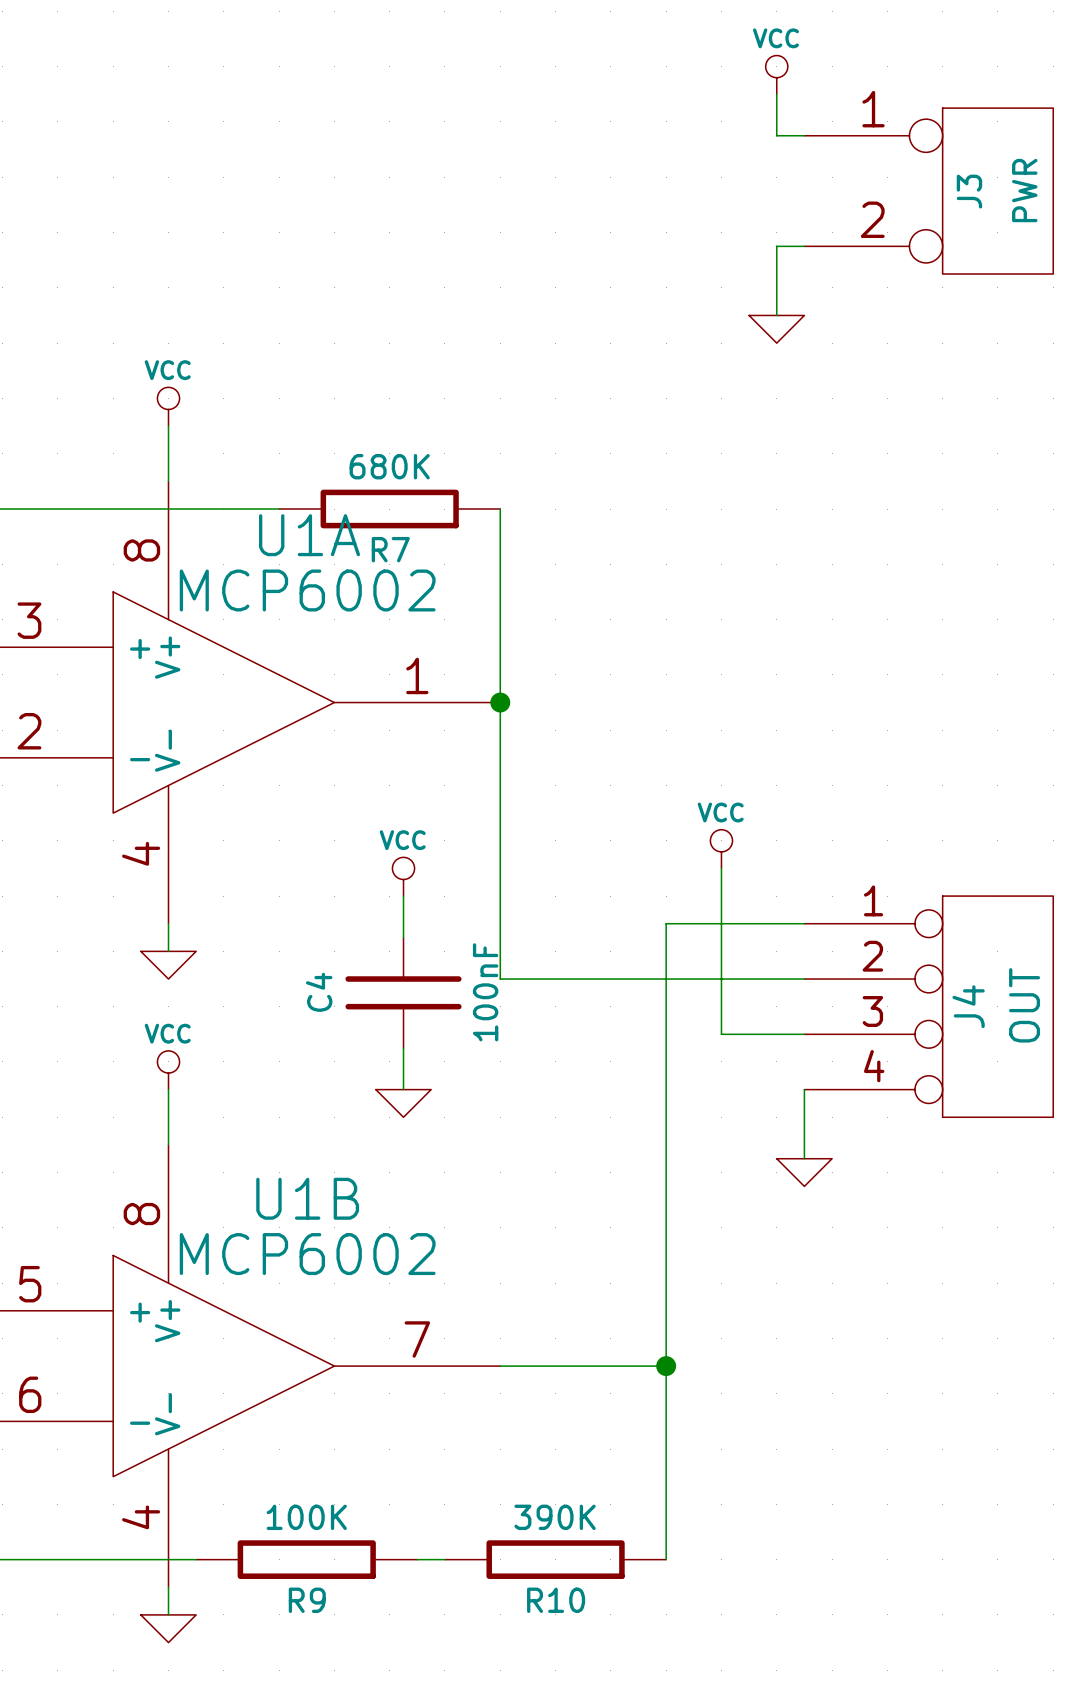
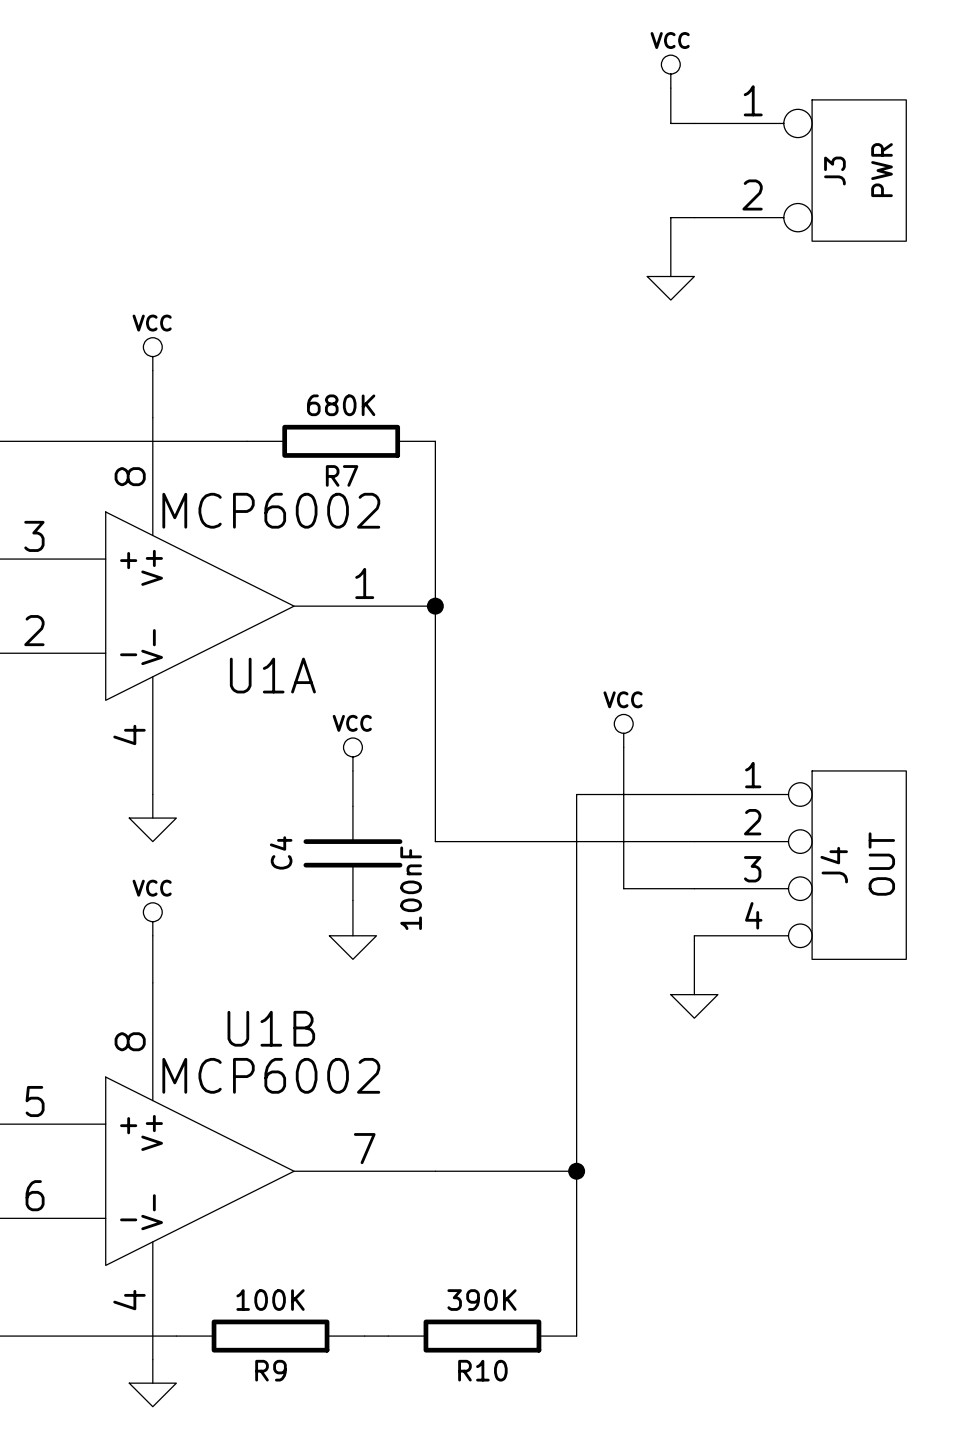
U1A name position: U1A (309, 535) -> U1A (272, 675)
C4 value position: 100nF (485, 992) -> 100nF (411, 888)

